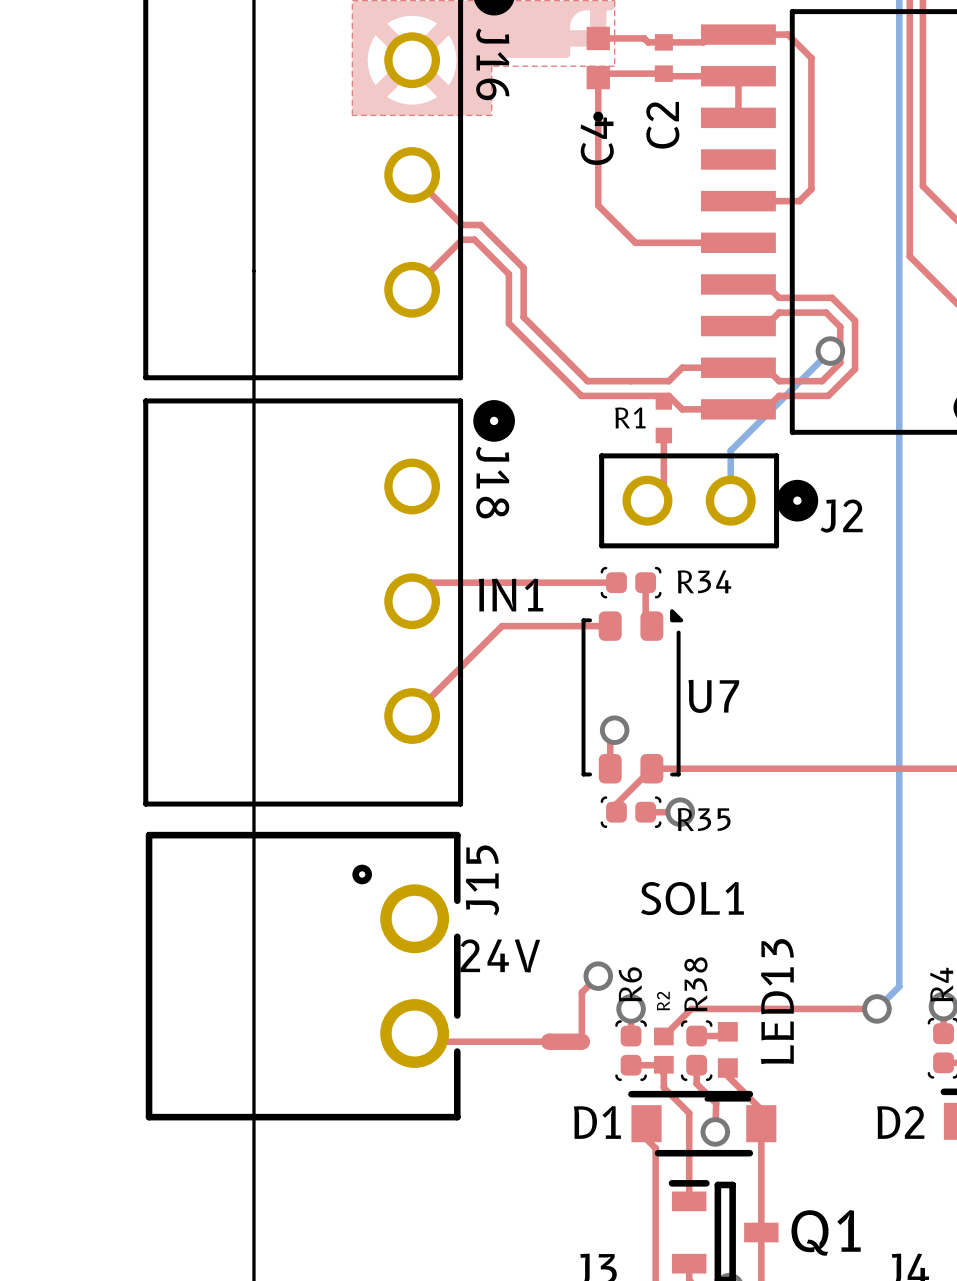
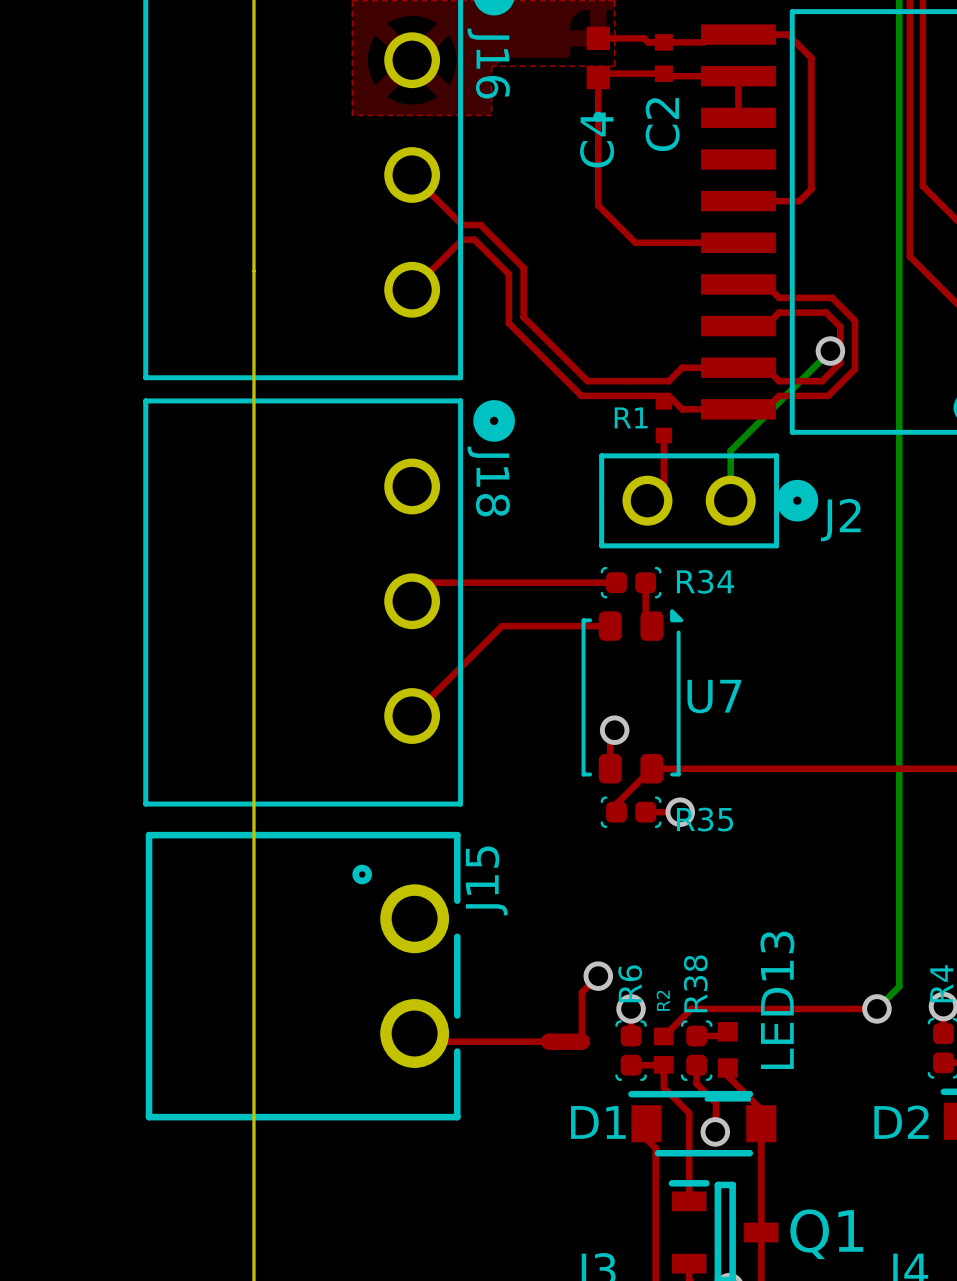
text: IN1 (511, 595) -> none
text: SOL1 (692, 898) -> none
text: 24V (500, 955) -> none

